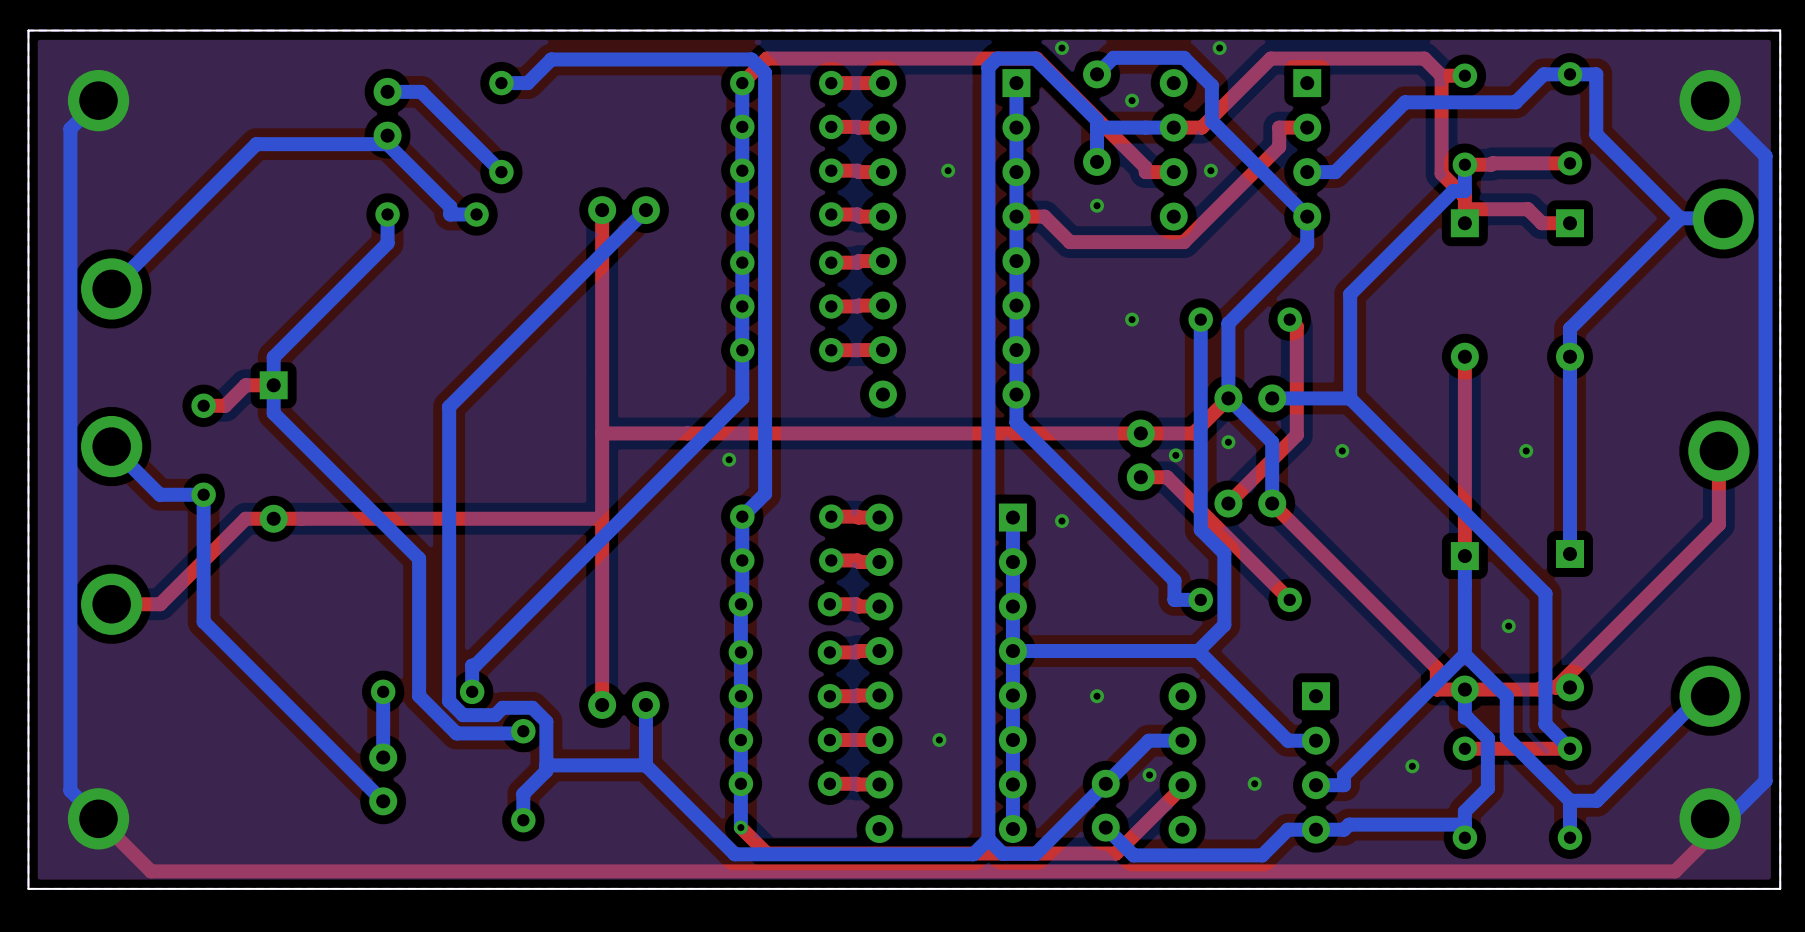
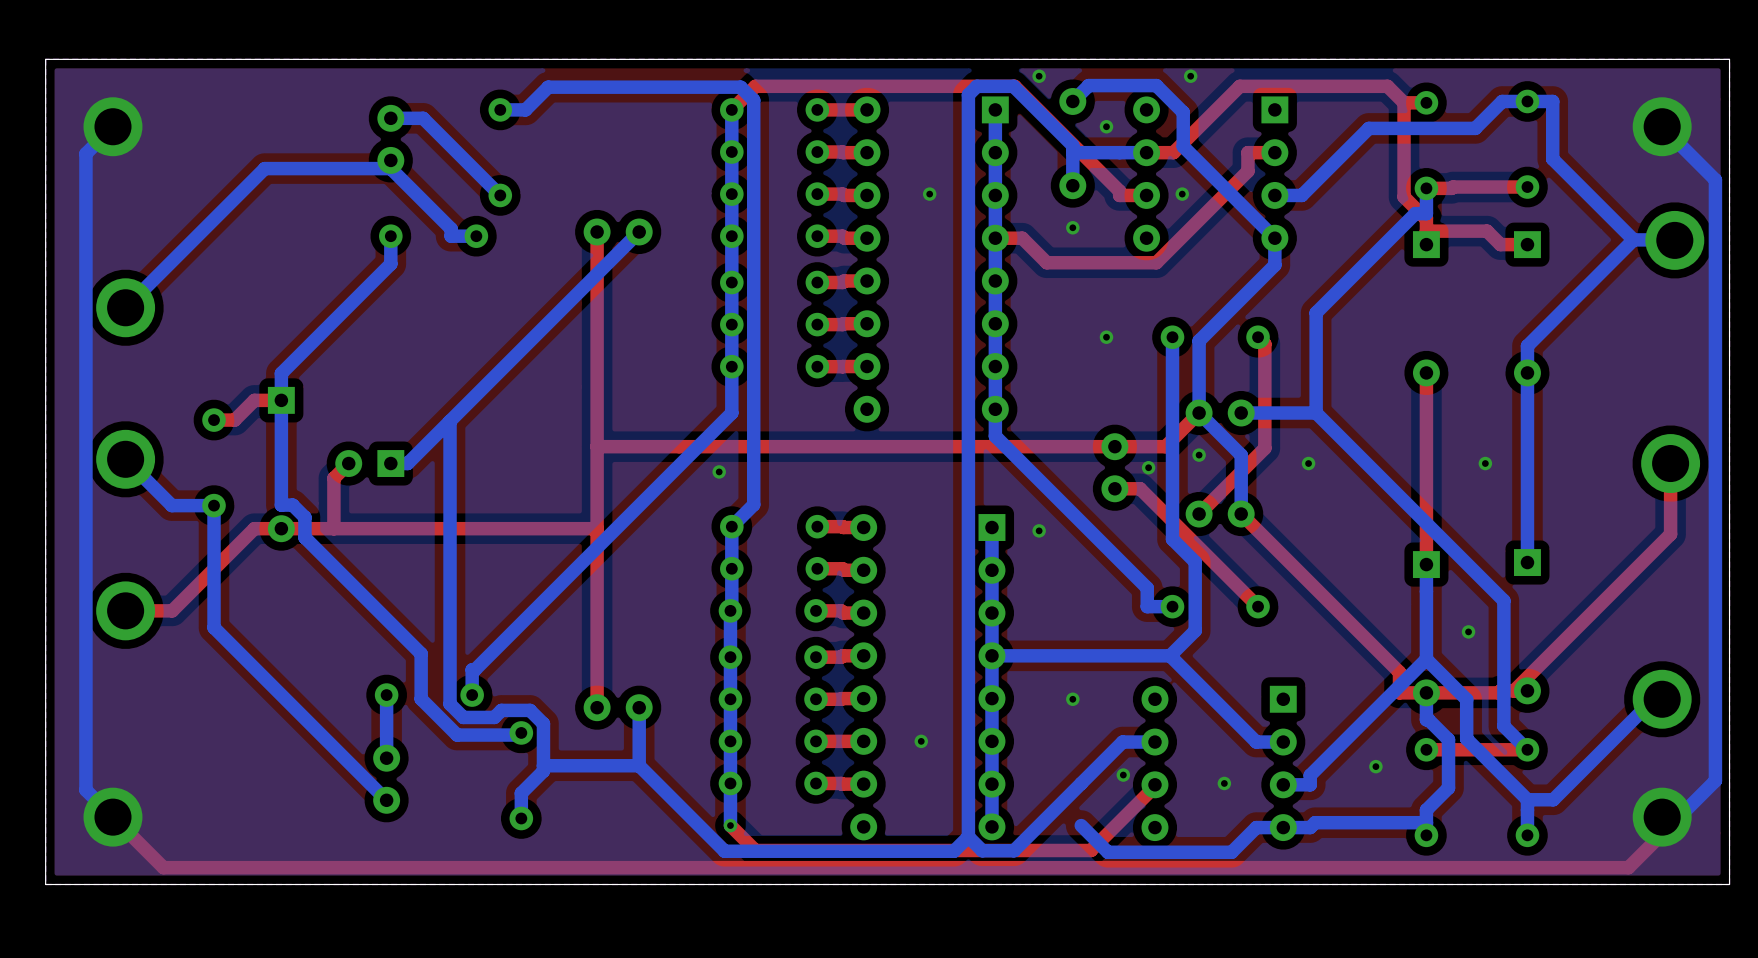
bottom track: none -> (450, 421) (407, 463) (390, 463)
bottom track: (273, 413) (419, 558) (419, 648) -> (281, 427) (281, 505) (292, 505) (304, 517) (304, 537) (421, 653)
top track: none -> (348, 463) (333, 478) (333, 528)
part: none -> (369, 463)
part: (1105, 805) -> none

